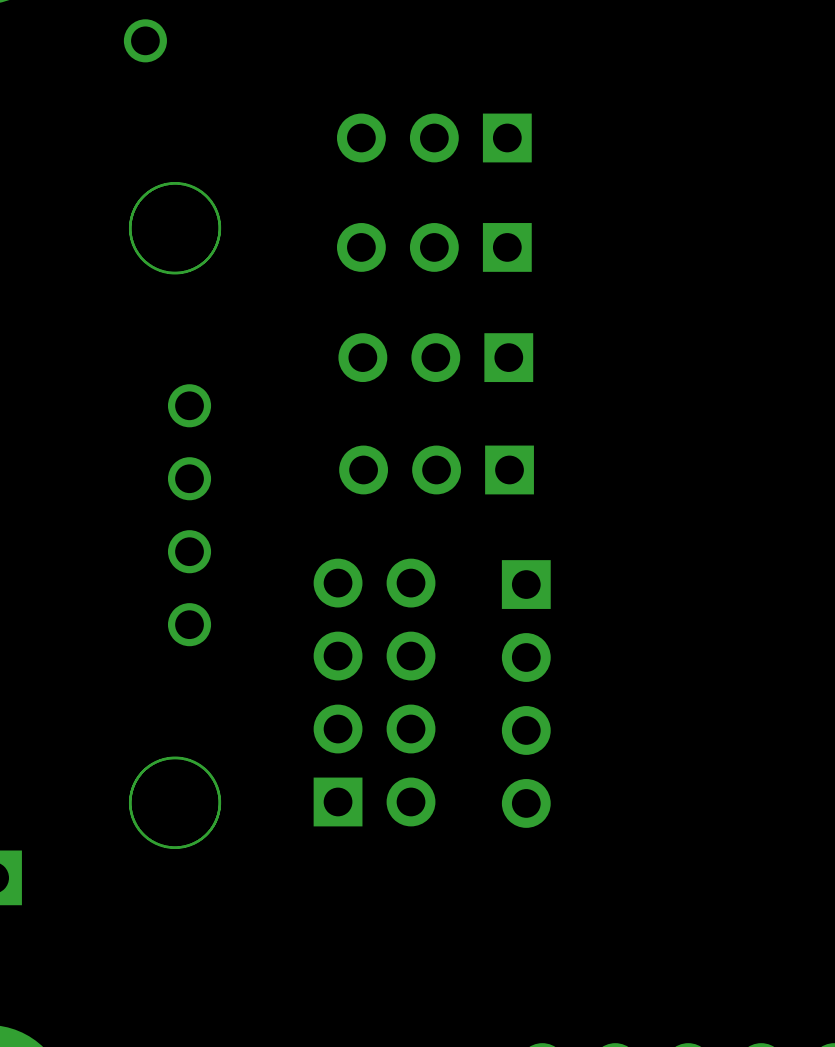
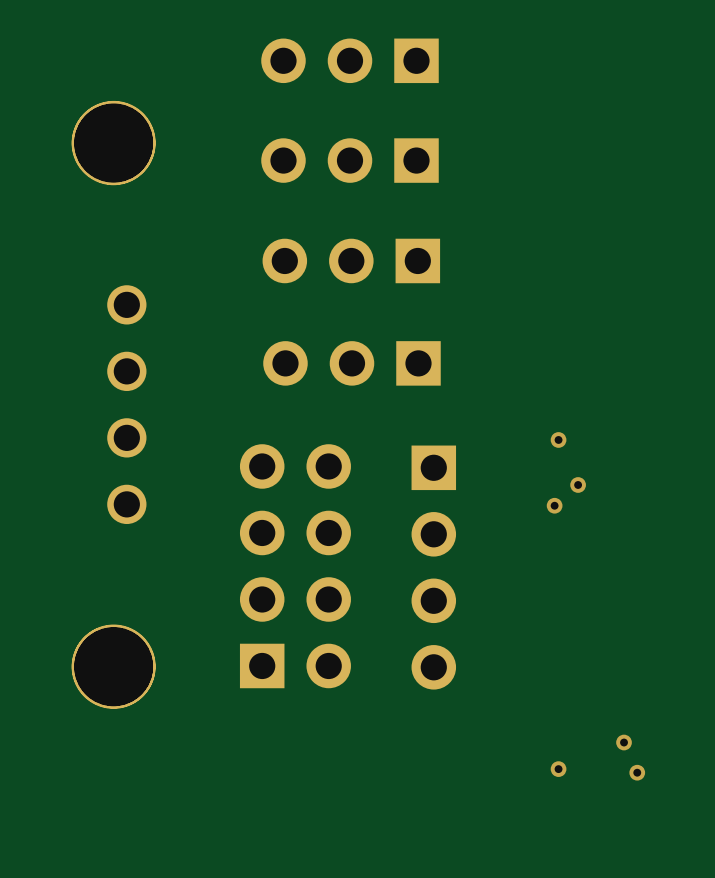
via: none -> (558, 439)
via: none -> (578, 484)
via: none -> (554, 505)
via: none -> (624, 742)
via: none -> (558, 769)
via: none -> (637, 772)

